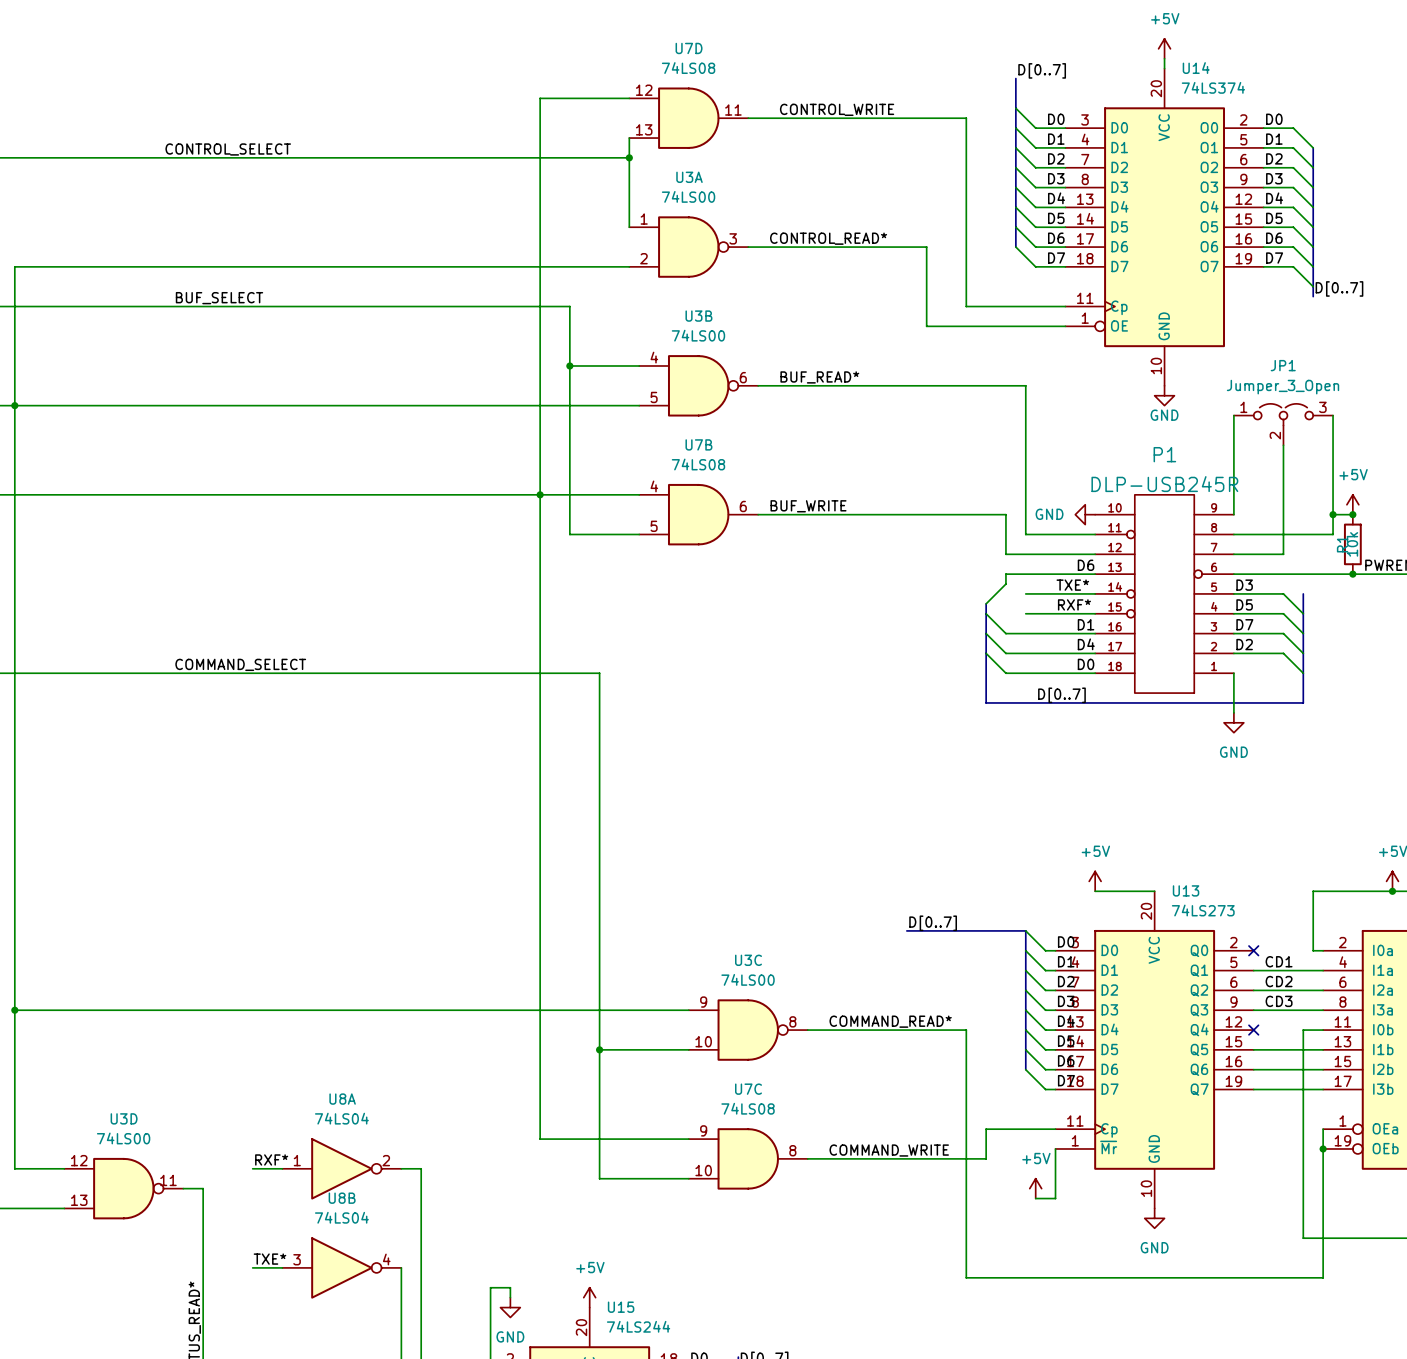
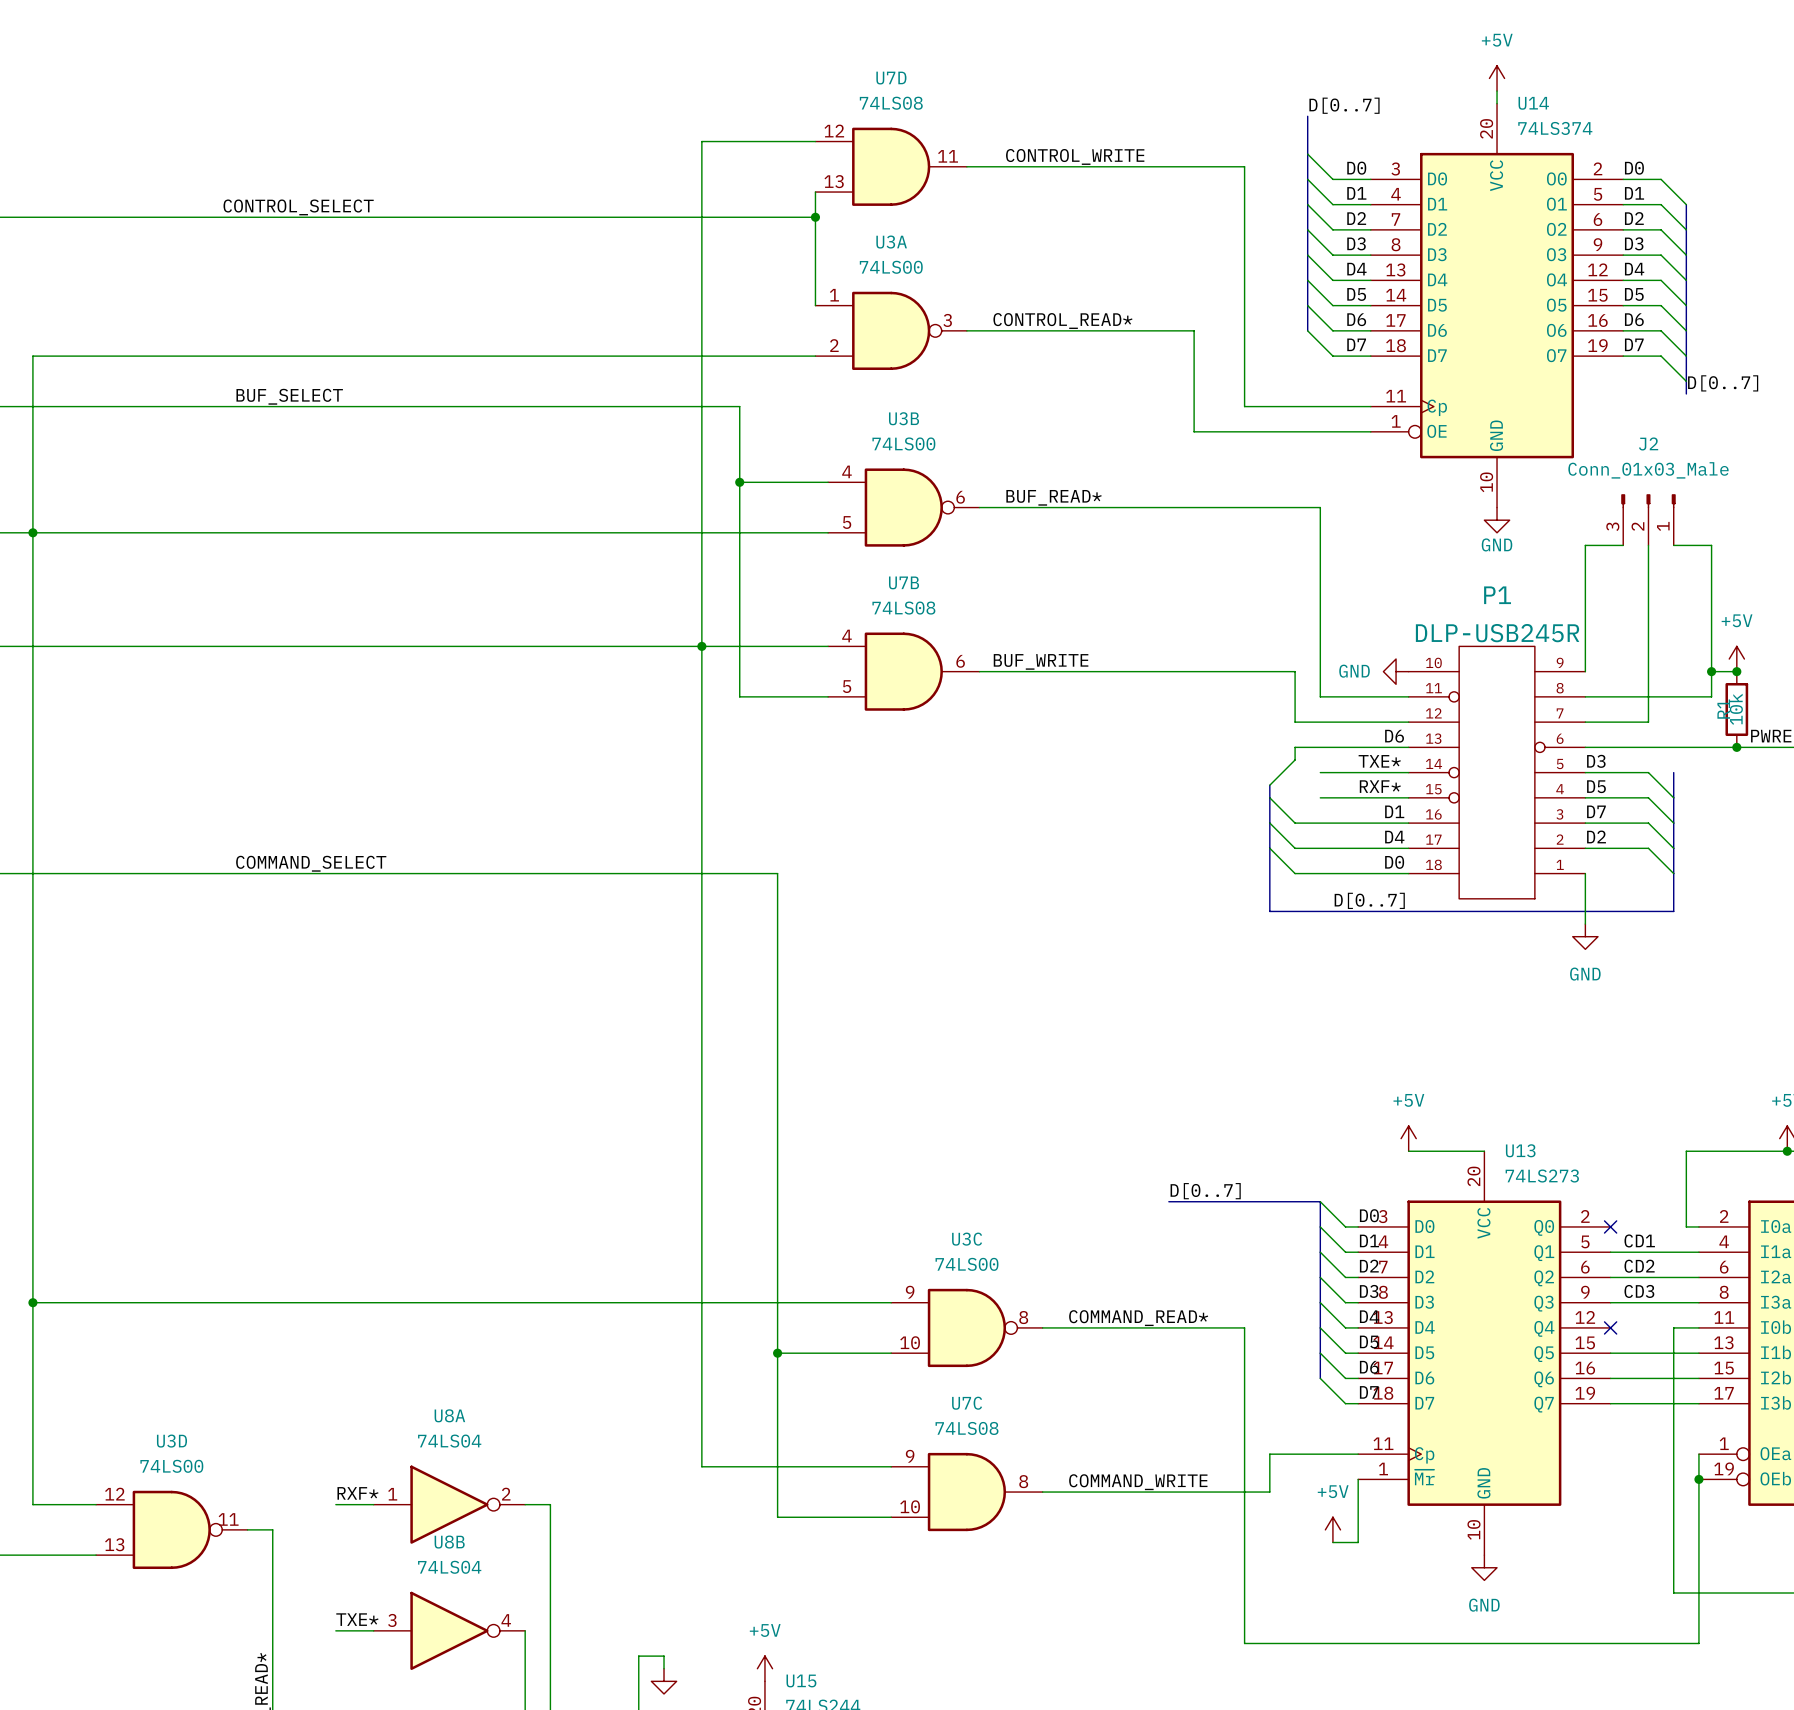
J2: none -> Conn_01x03_Male (1648, 519)
JP1: Jumper_3_Open (1283, 424) -> none

